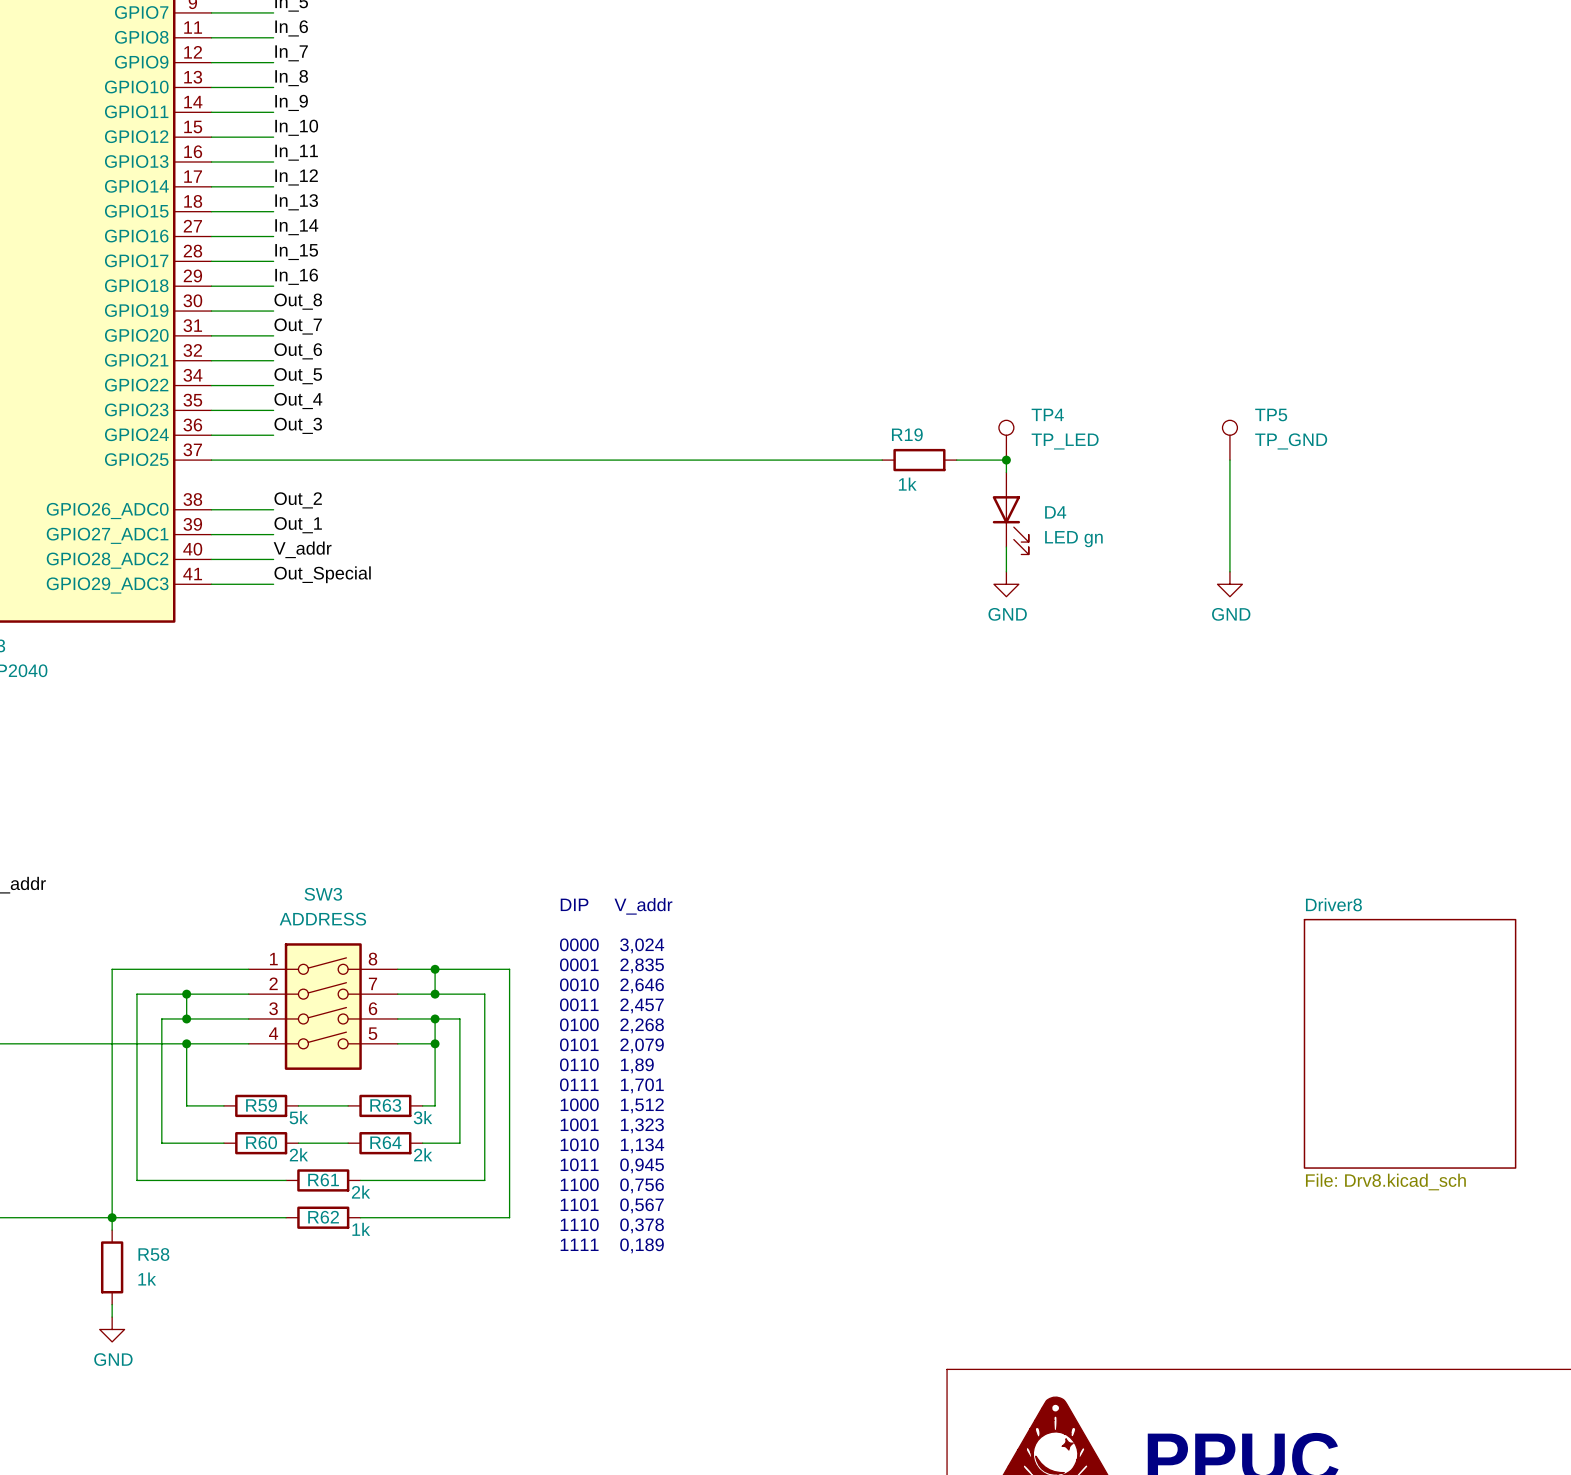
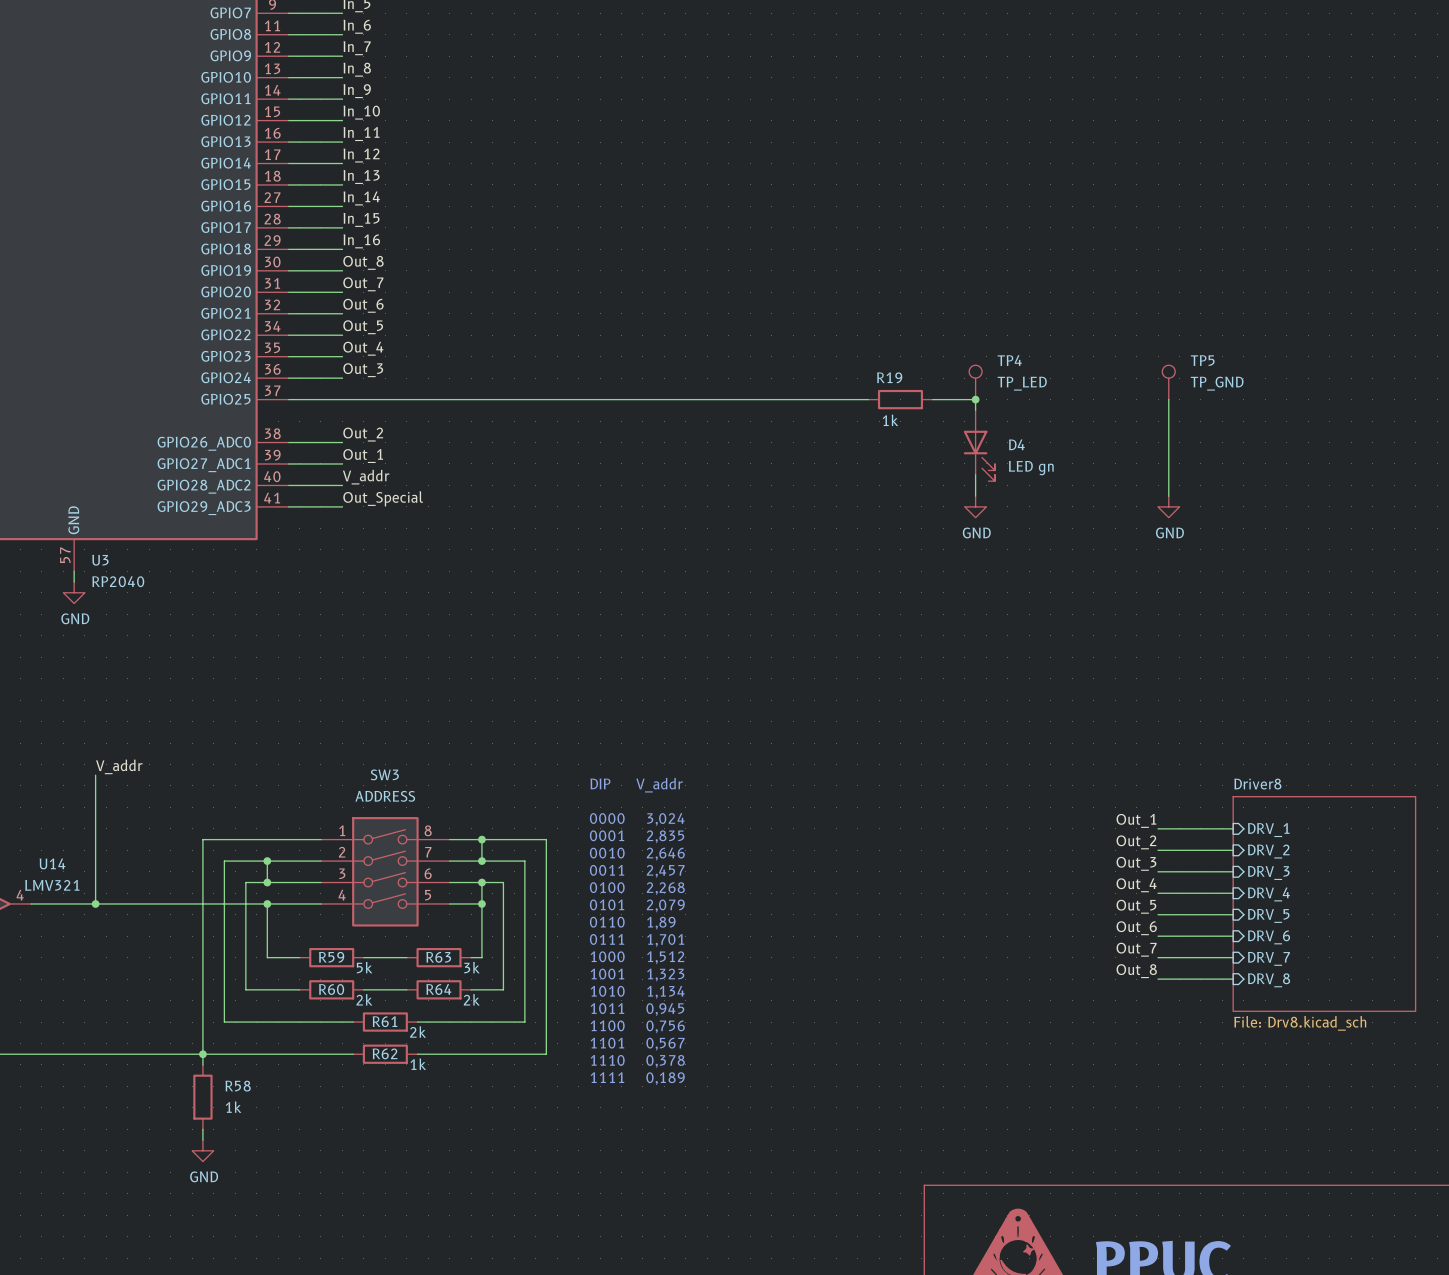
label: none -> Out_1 (1136, 820)
wire: none -> (1158, 828) (1233, 828)
sheet pin: none -> DRV_1 (1268, 830)
label: none -> Out_2 (1136, 842)
wire: none -> (1158, 850) (1233, 850)
sheet pin: none -> DRV_2 (1268, 851)
label: none -> Out_3 (1136, 863)
wire: none -> (1158, 871) (1233, 871)
sheet pin: none -> DRV_3 (1268, 873)
label: none -> Out_4 (1136, 885)
wire: none -> (1158, 893) (1233, 893)
sheet pin: none -> DRV_4 (1268, 894)
label: none -> Out_5 (1136, 906)
wire: none -> (1158, 914) (1233, 914)
sheet pin: none -> DRV_5 (1268, 915)
label: none -> Out_6 (1136, 928)
wire: none -> (1158, 936) (1233, 936)
sheet pin: none -> DRV_6 (1269, 937)
label: none -> Out_7 (1136, 949)
wire: none -> (1158, 957) (1233, 957)
sheet pin: none -> DRV_7 (1268, 958)
label: none -> Out_8 (1136, 971)
wire: none -> (1158, 979) (1233, 979)
sheet pin: none -> DRV_8 (1269, 980)

